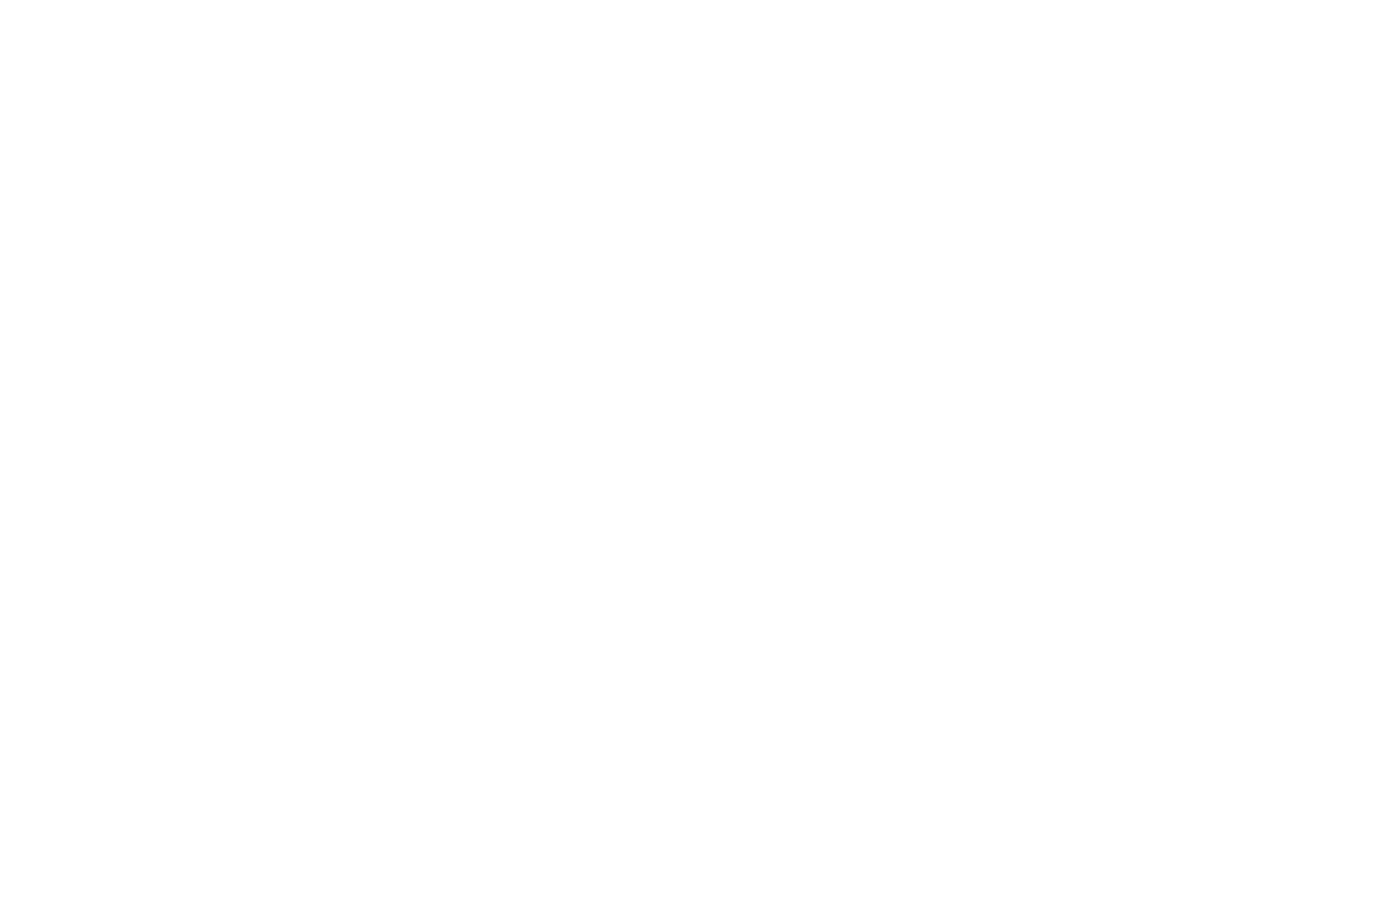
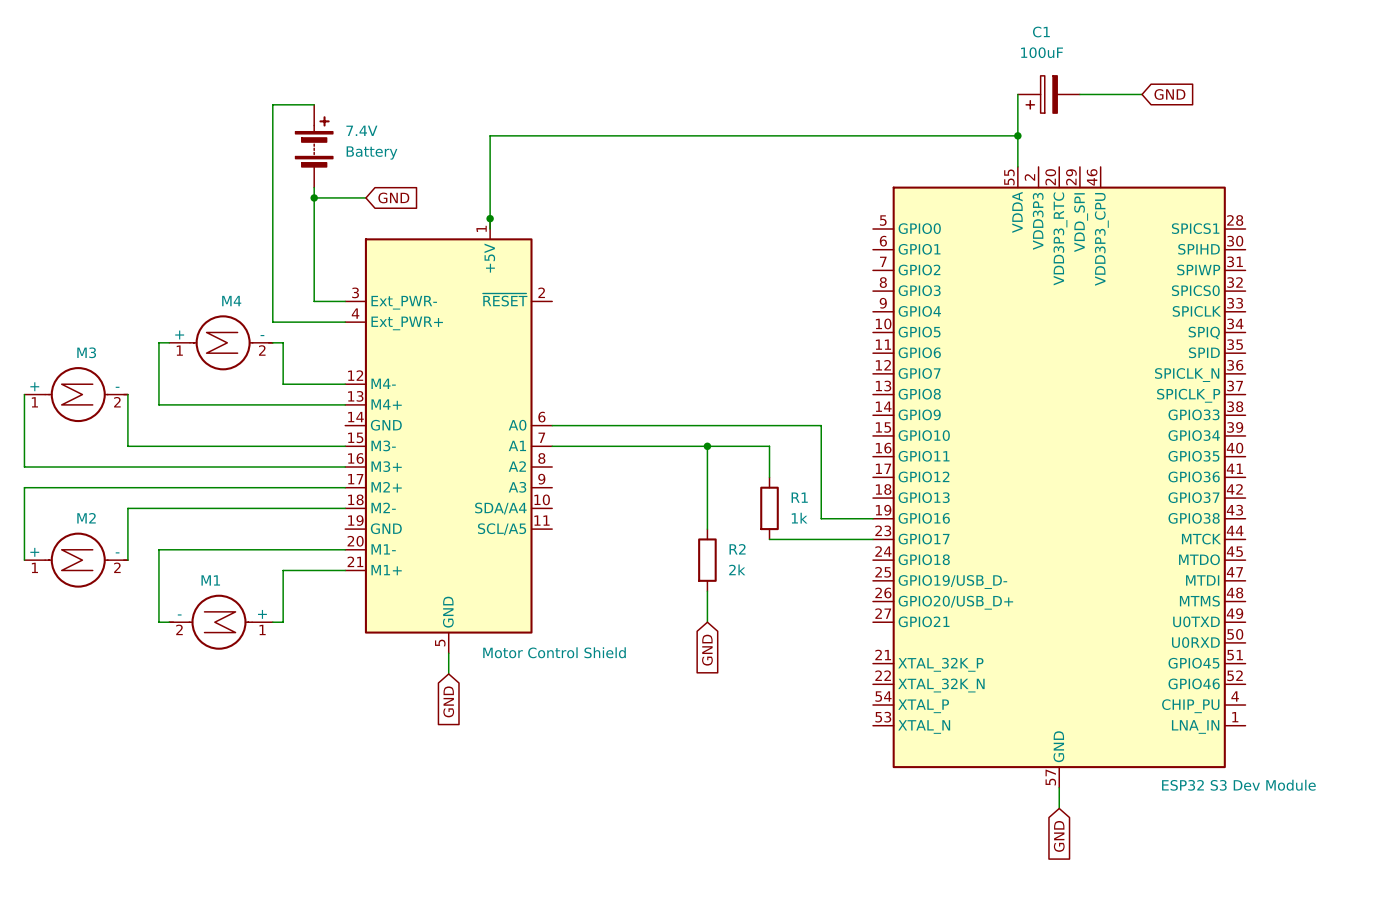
wire: none -> (1017, 94) (1017, 166)
C1: none -> 100uF (1048, 94)
wire: none -> (1079, 94) (1142, 94)
global label: none -> GND (1169, 94)
wire: none -> (314, 104) (272, 104) (272, 322) (345, 322)
wire: none -> (1017, 135) (490, 135) (490, 229)
junction: none -> (1017, 135)
7.4V: none -> Battery (314, 146)
wire: none -> (314, 187) (314, 301) (345, 301)
wire: none -> (314, 197) (365, 197)
junction: none -> (314, 197)
global label: none -> GND (393, 197)
junction: none -> (490, 218)
wire: none -> (169, 342) (158, 342) (158, 404) (345, 404)
M4: none -> (221, 342)
wire: none -> (272, 342) (283, 342) (283, 384) (345, 384)
wire: none -> (24, 394) (24, 467) (345, 467)
M3: none -> (76, 394)
wire: none -> (127, 394) (127, 446) (345, 446)
wire: none -> (552, 425) (821, 425) (821, 518) (872, 518)
part: none -> Motor Control Shield (448, 435)
wire: none -> (552, 446) (769, 446) (769, 477)
wire: none -> (707, 446) (707, 529)
junction: none -> (707, 446)
part: none -> ESP32 S3 Dev Module (1059, 477)
wire: none -> (345, 487) (24, 487) (24, 560)
wire: none -> (345, 508) (127, 508) (127, 560)
R1: none -> 1k (769, 508)
wire: none -> (769, 539) (872, 539)
wire: none -> (345, 549) (158, 549) (158, 622) (169, 622)
M2: none -> (76, 560)
R2: none -> 2k (707, 560)
wire: none -> (345, 570) (283, 570) (283, 622) (272, 622)
wire: none -> (707, 591) (707, 622)
M1: none -> (221, 622)
global label: none -> GND (707, 650)
wire: none -> (448, 653) (448, 673)
global label: none -> GND (448, 701)
wire: none -> (1059, 787) (1059, 808)
global label: none -> GND (1059, 836)

